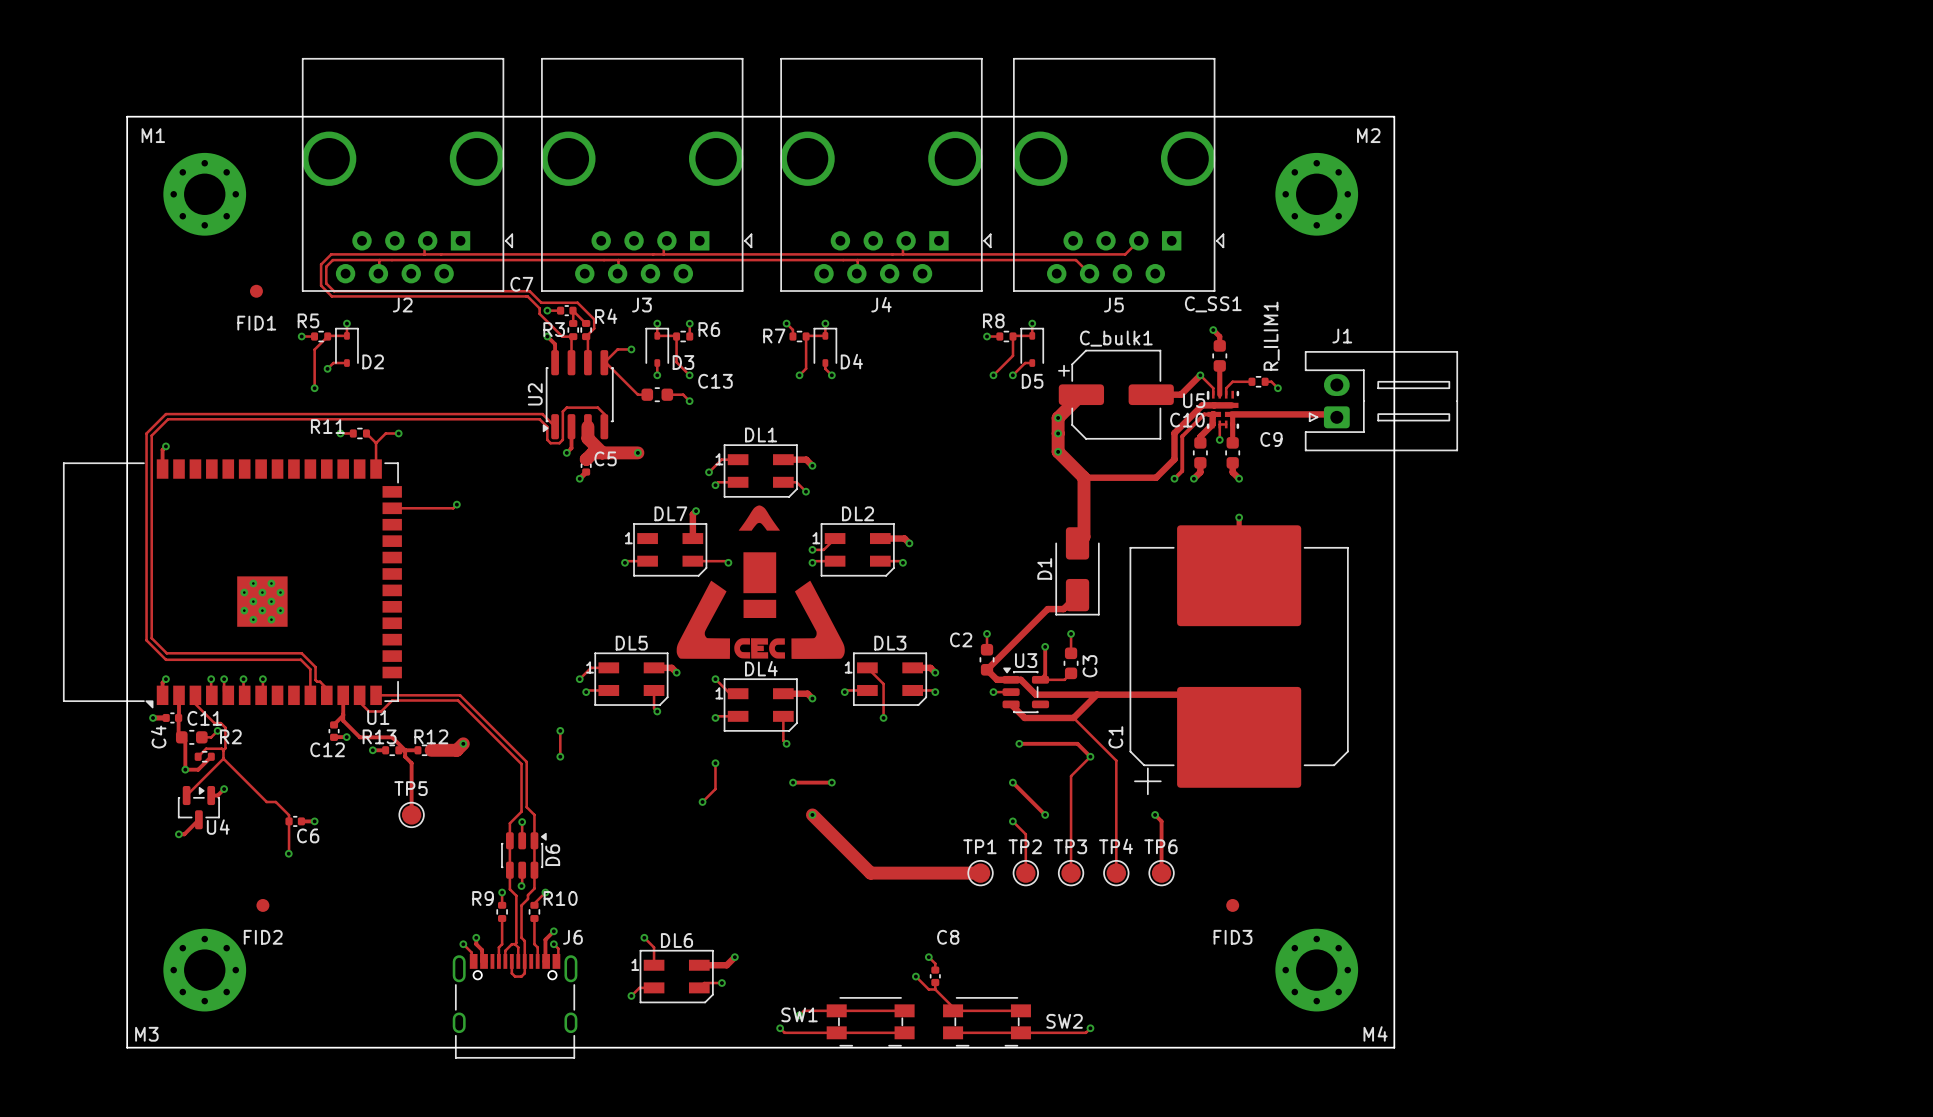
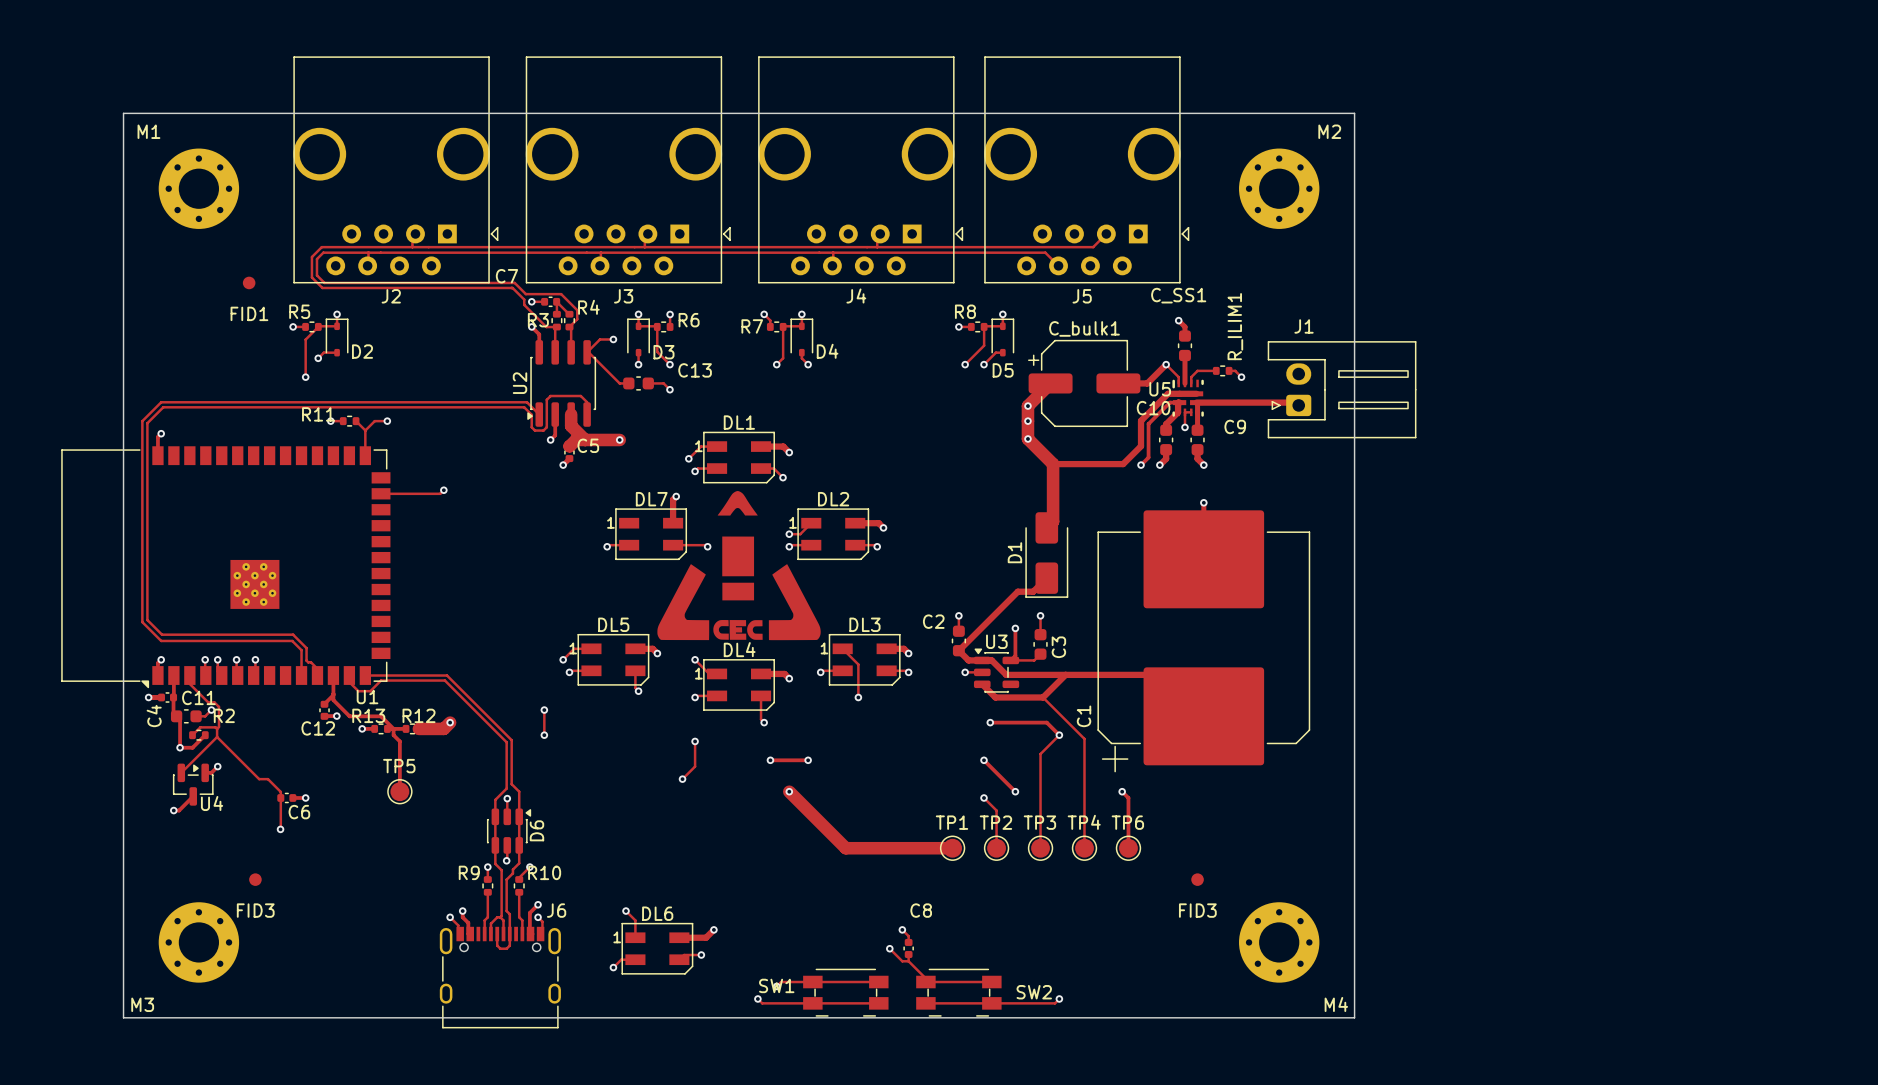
FID2 name: FID2 (263, 937) -> FID3 (255, 910)

